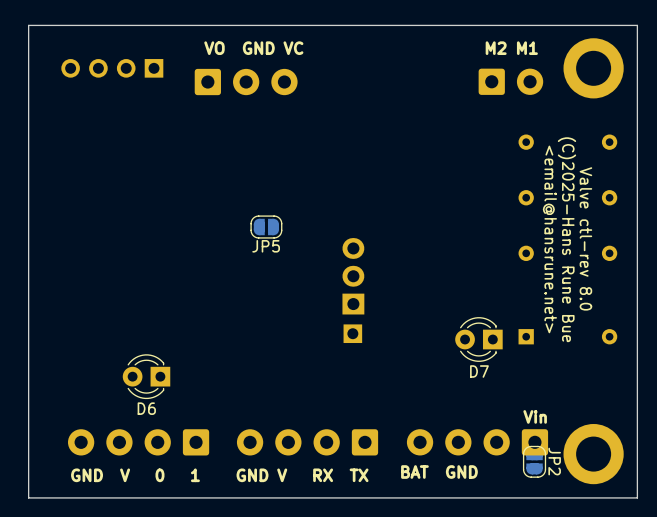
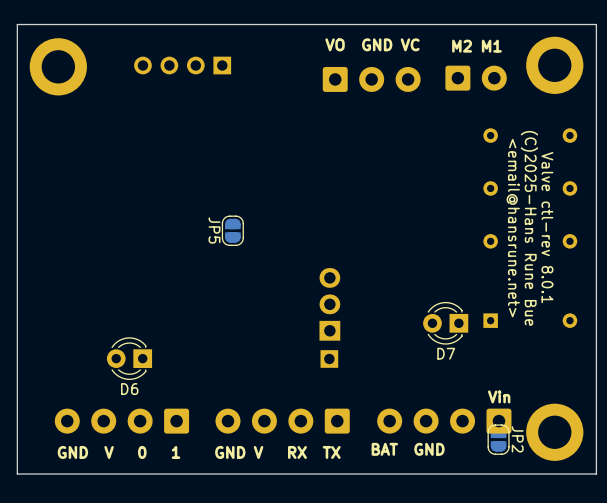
text position: VO GND VC (253, 48) -> VO GND VC (372, 44)
part position: (112, 68) -> (182, 65)
part: none -> (58, 66)
part position: (246, 82) -> (371, 79)
JP5 rotation: 0° (266, 227) -> 90° clockwise (232, 230)
text: Valve ctl-rev 8.0 (585, 238) -> Valve ctl-rev 8.0.1 (547, 227)
part position: (353, 276) -> (329, 304)
part position: (352, 333) -> (329, 358)

